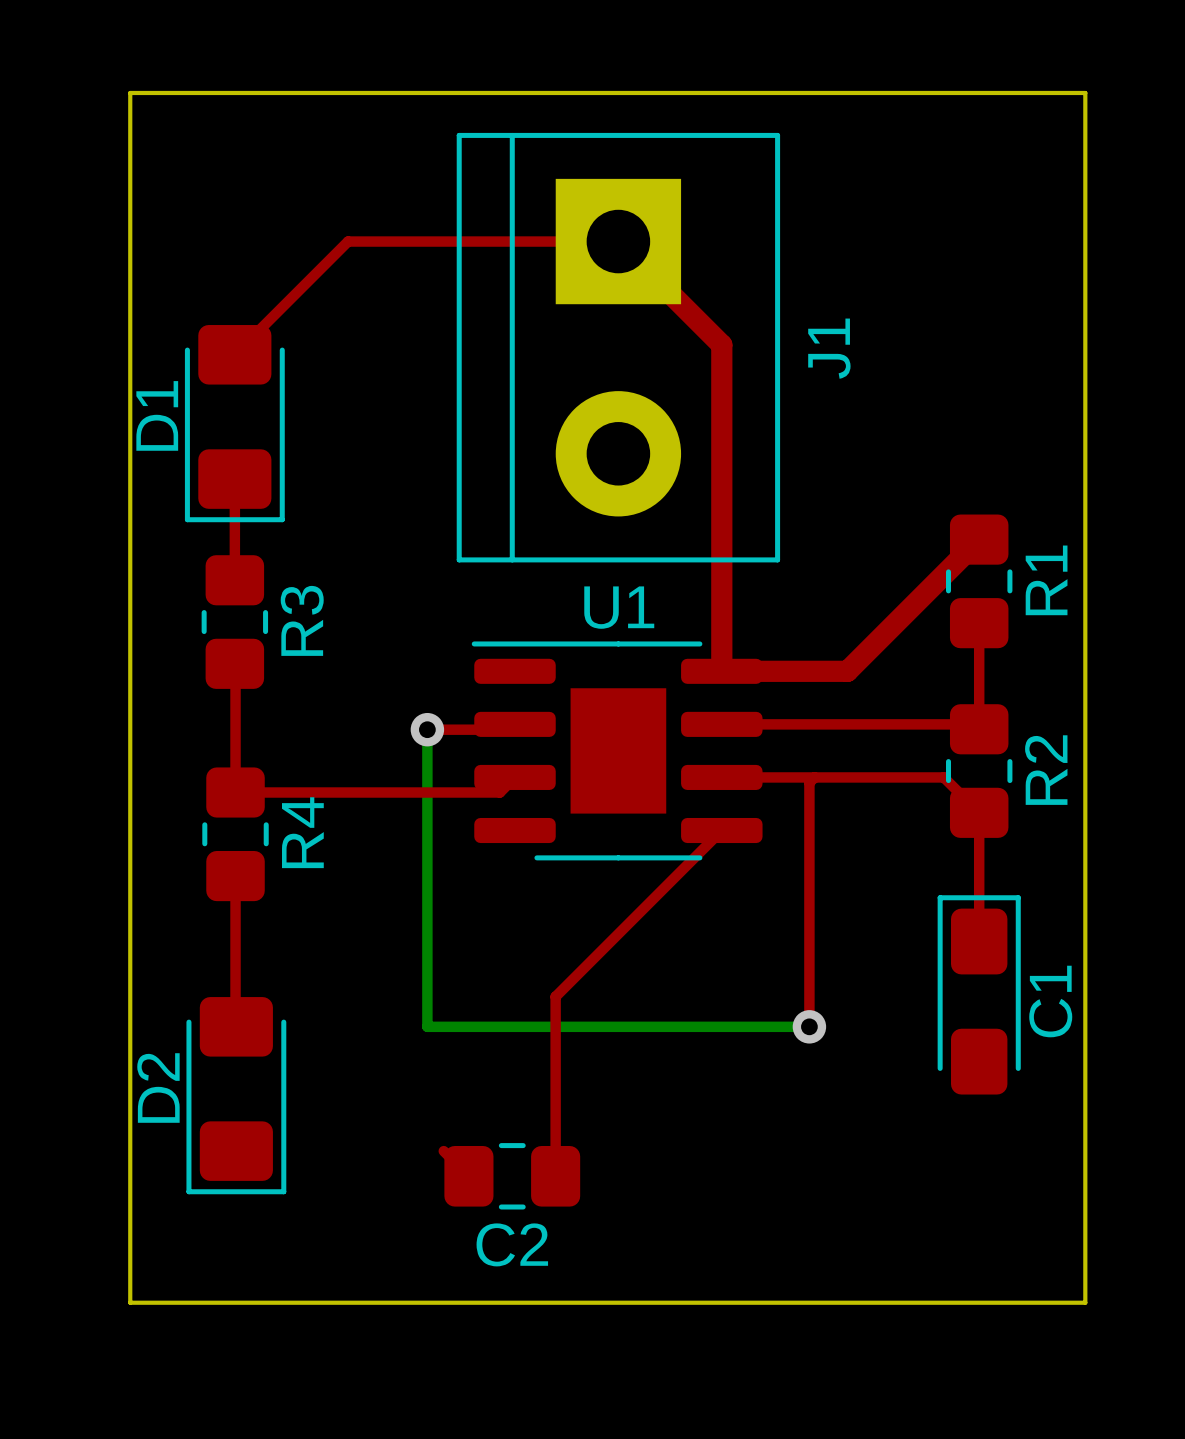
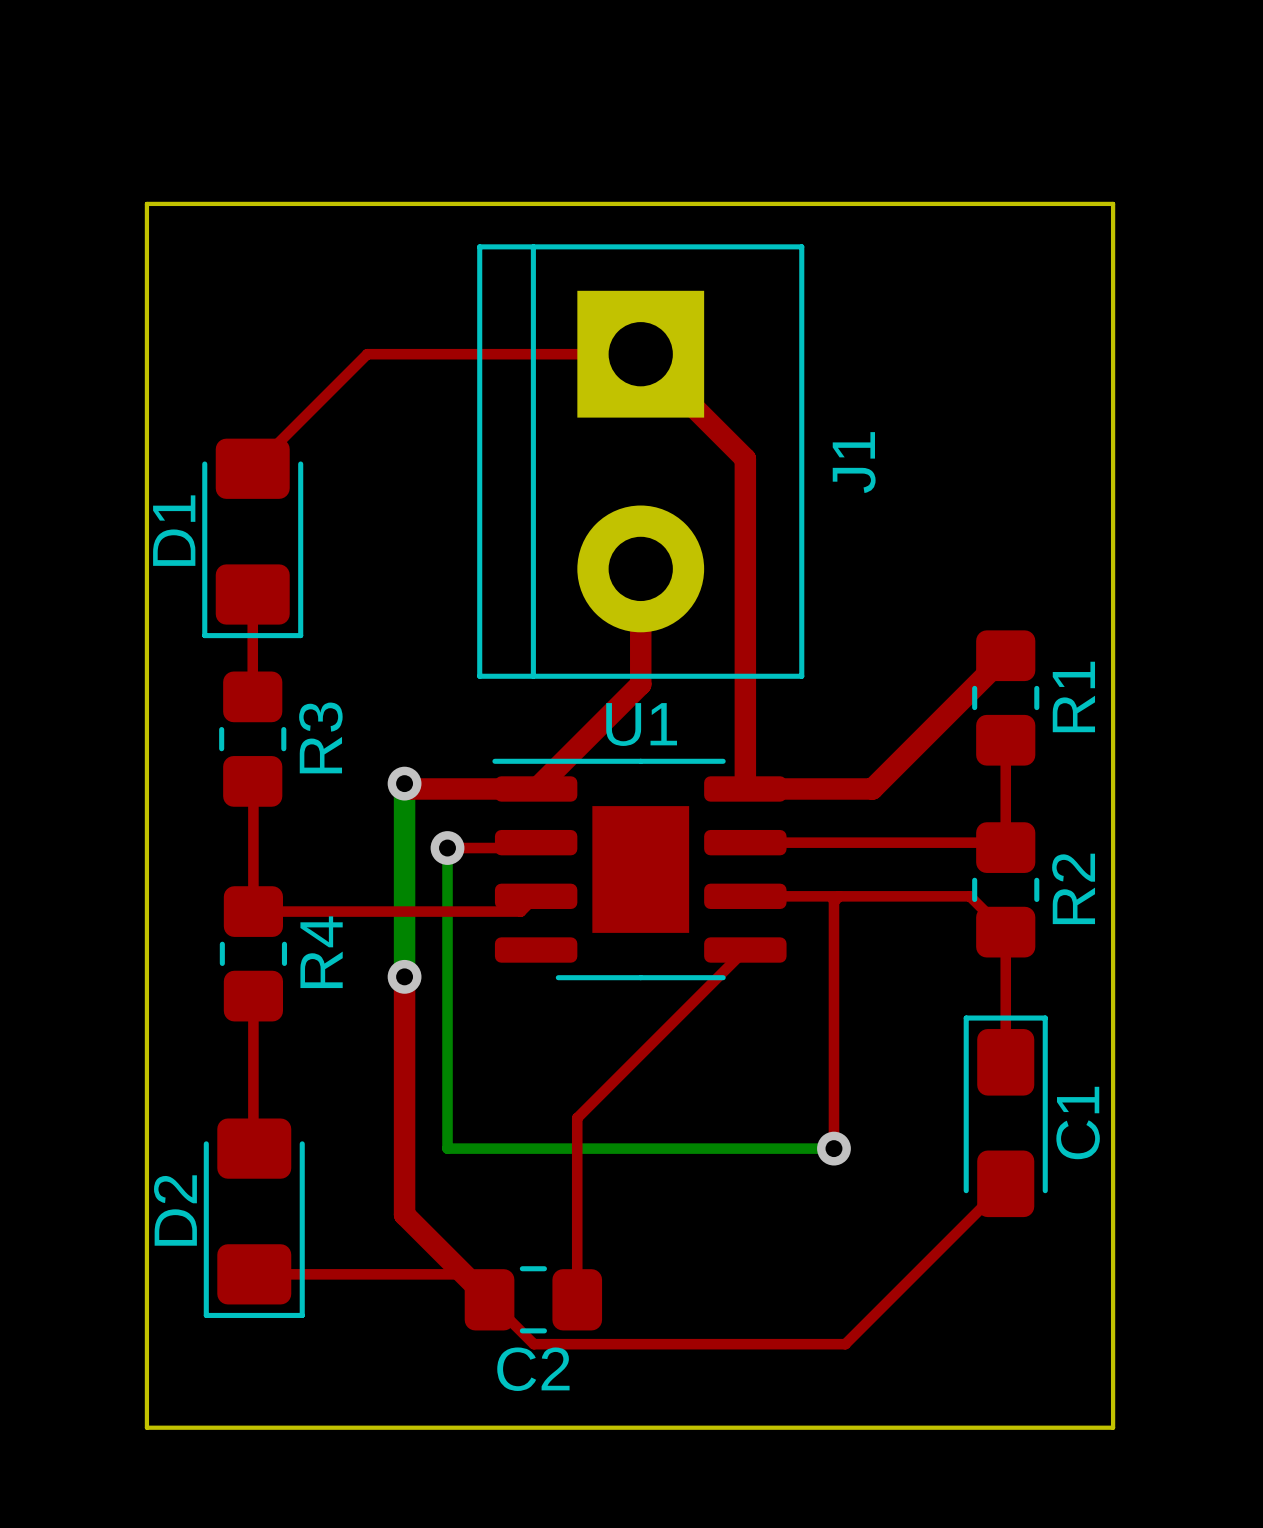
top track: none -> (640, 568) (640, 684) (536, 788) (409, 788) (404, 783)
bottom track: none -> (404, 783) (404, 976)
via: none -> (404, 783)
top track: none -> (404, 976) (404, 1214) (533, 1344) (845, 1344) (1005, 1183)
via: none -> (404, 976)
top track: none -> (254, 1274) (464, 1274)

